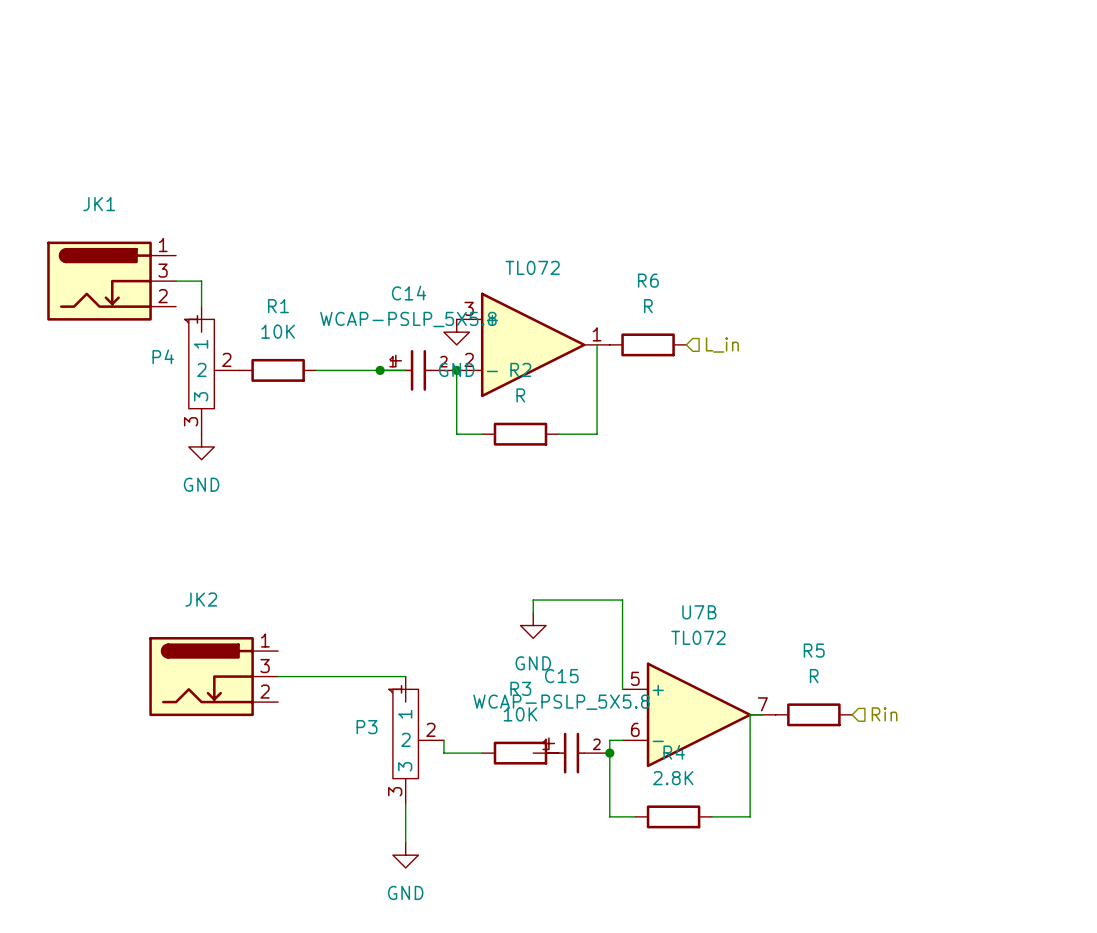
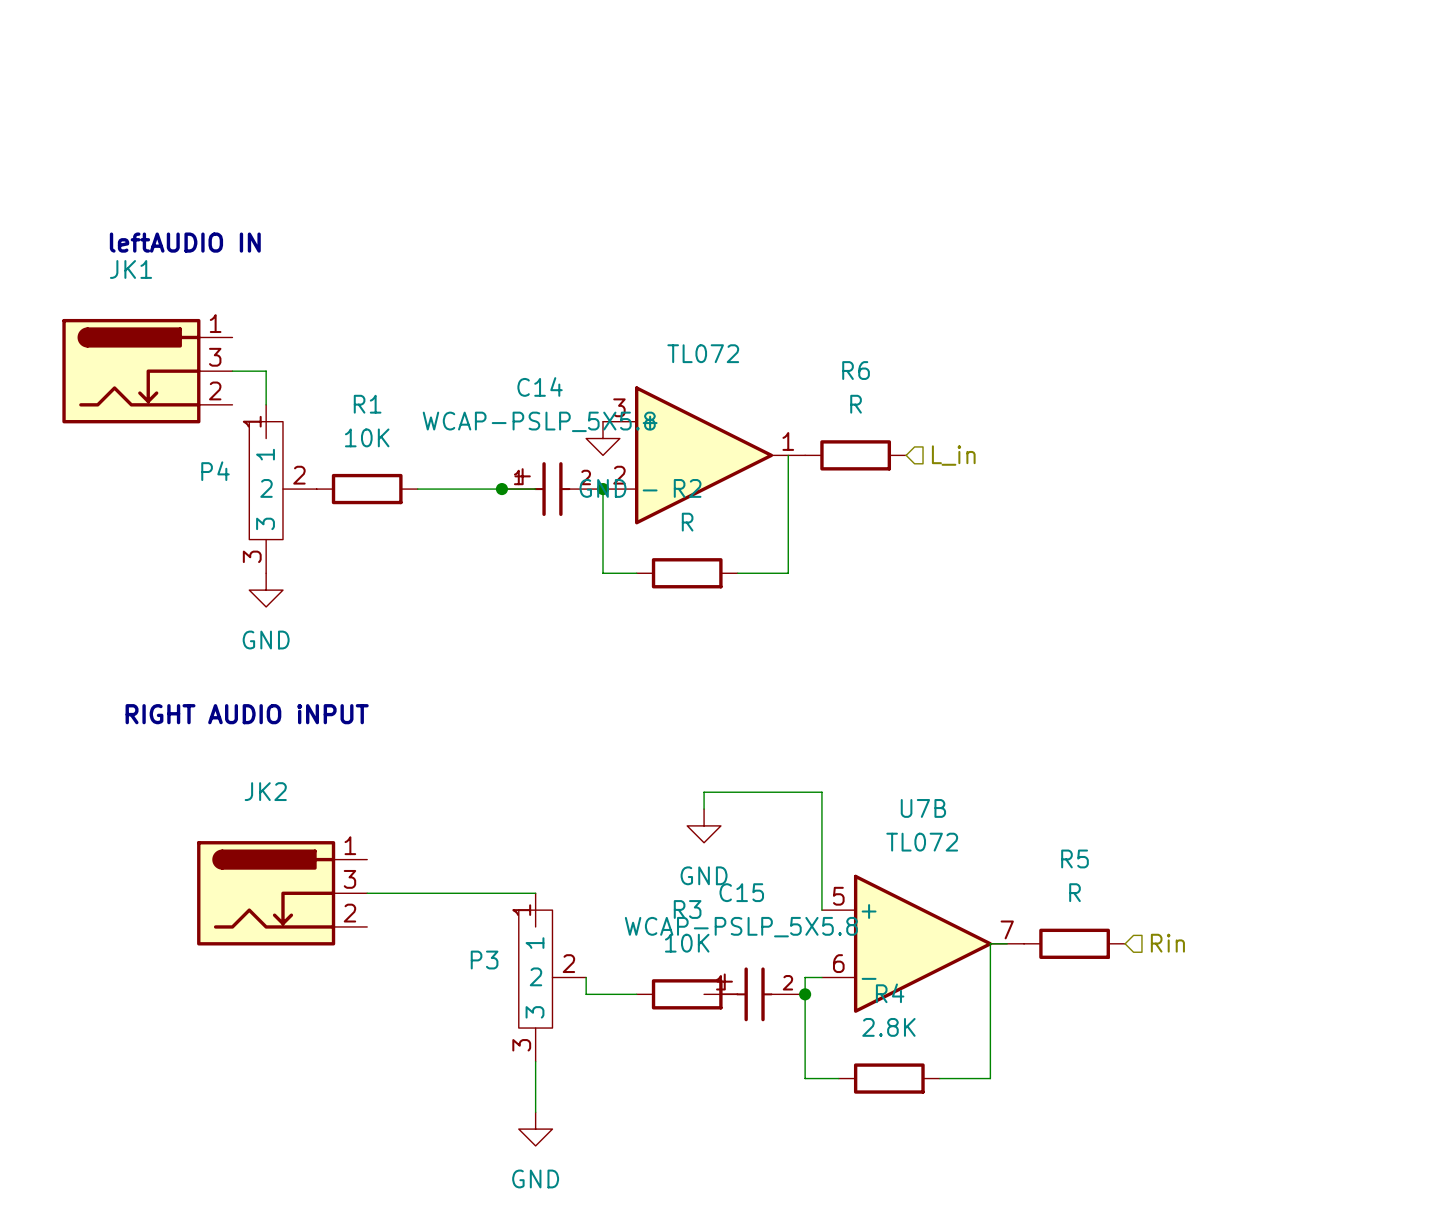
text: none -> leftAUDIO IN (185, 242)
text: none -> RIGHT AUDIO iNPUT (247, 714)

